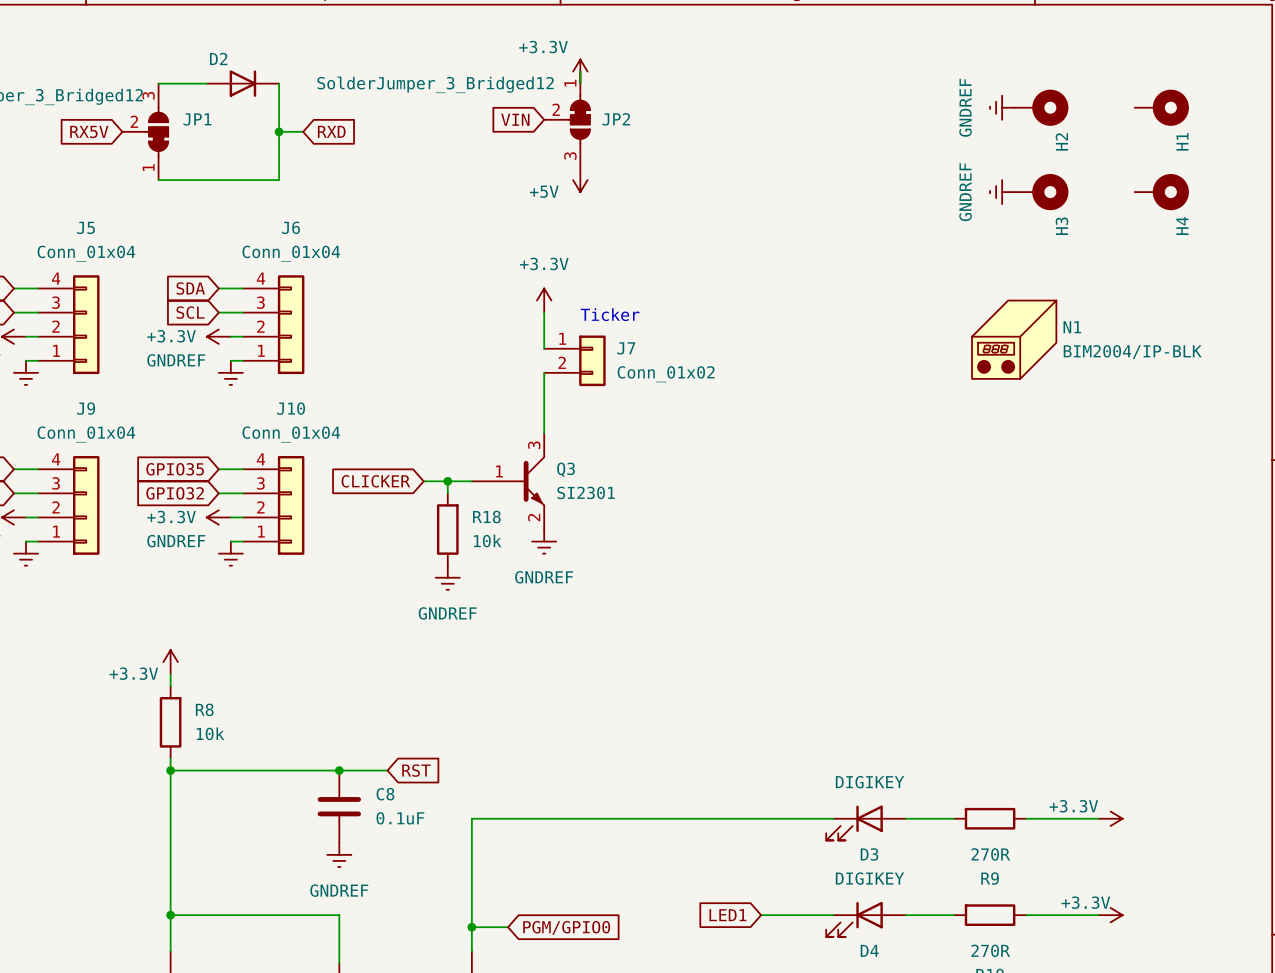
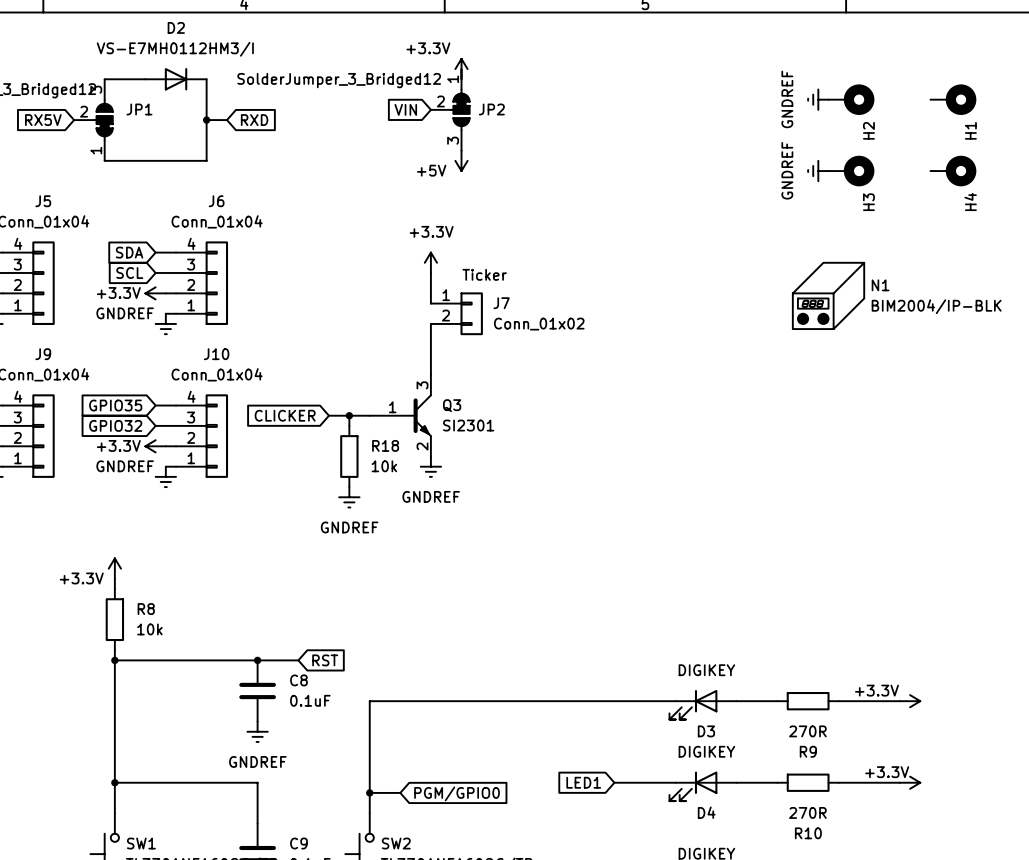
D2 value: none -> VS-E7MH0112HM3/I (175, 49)
D2 name position: D2 (218, 58) -> D2 (176, 27)

